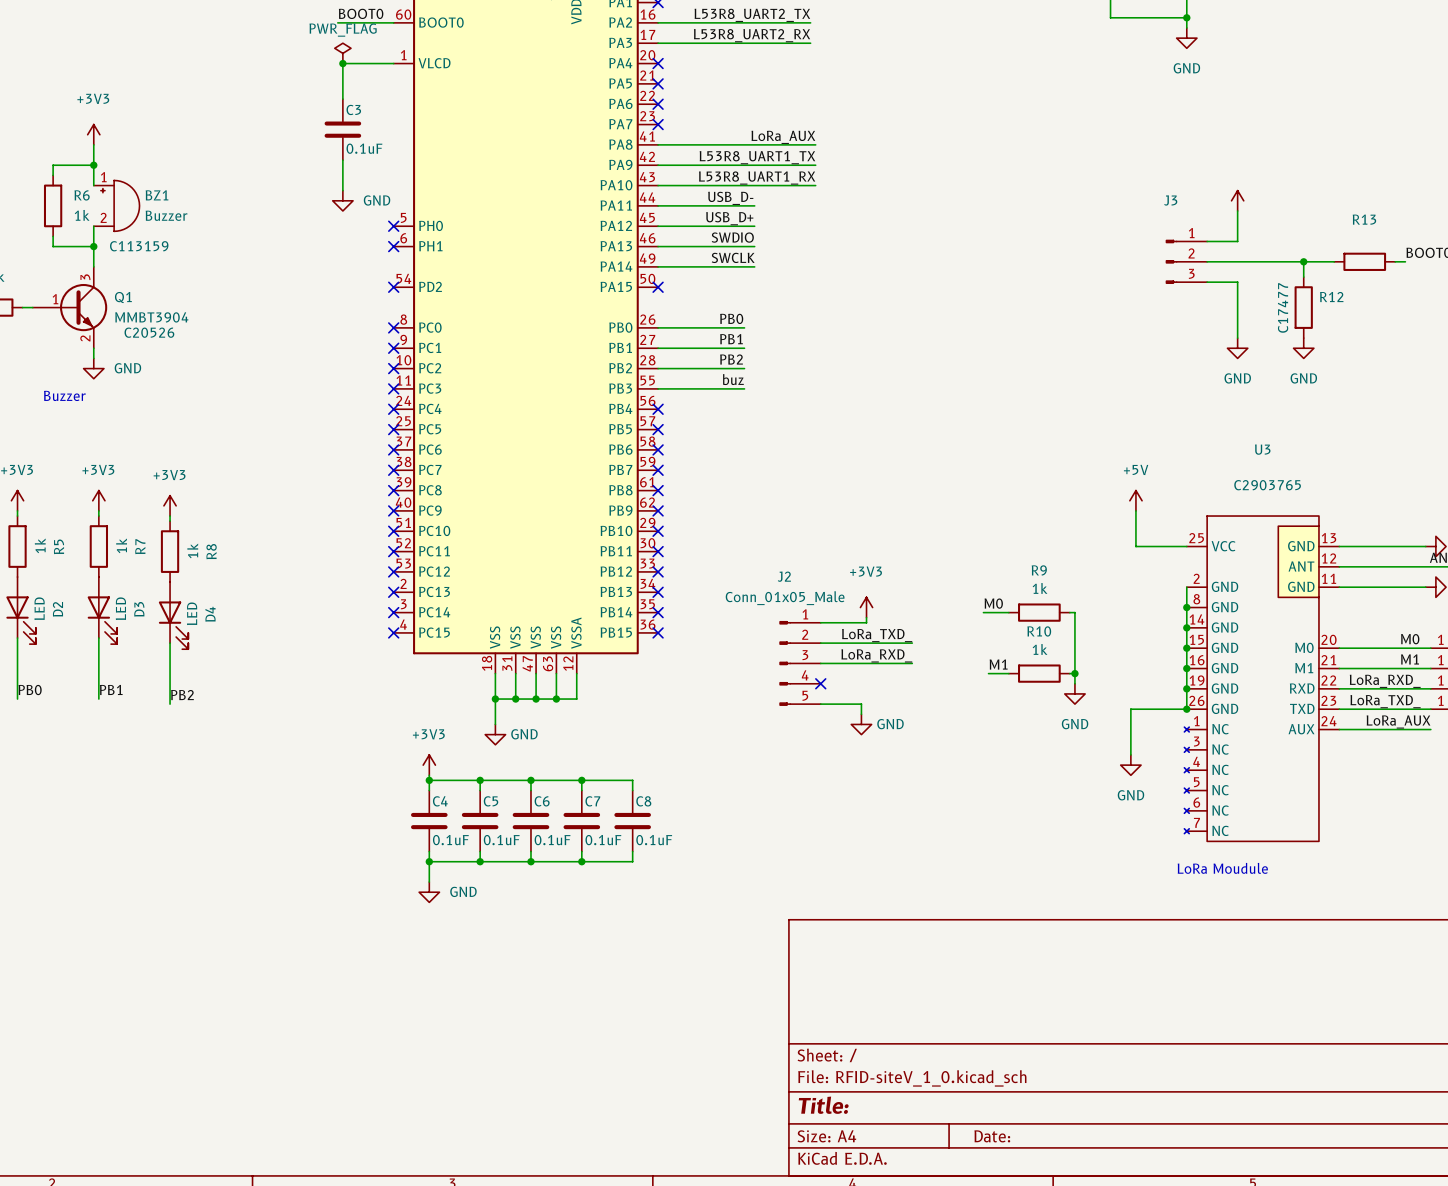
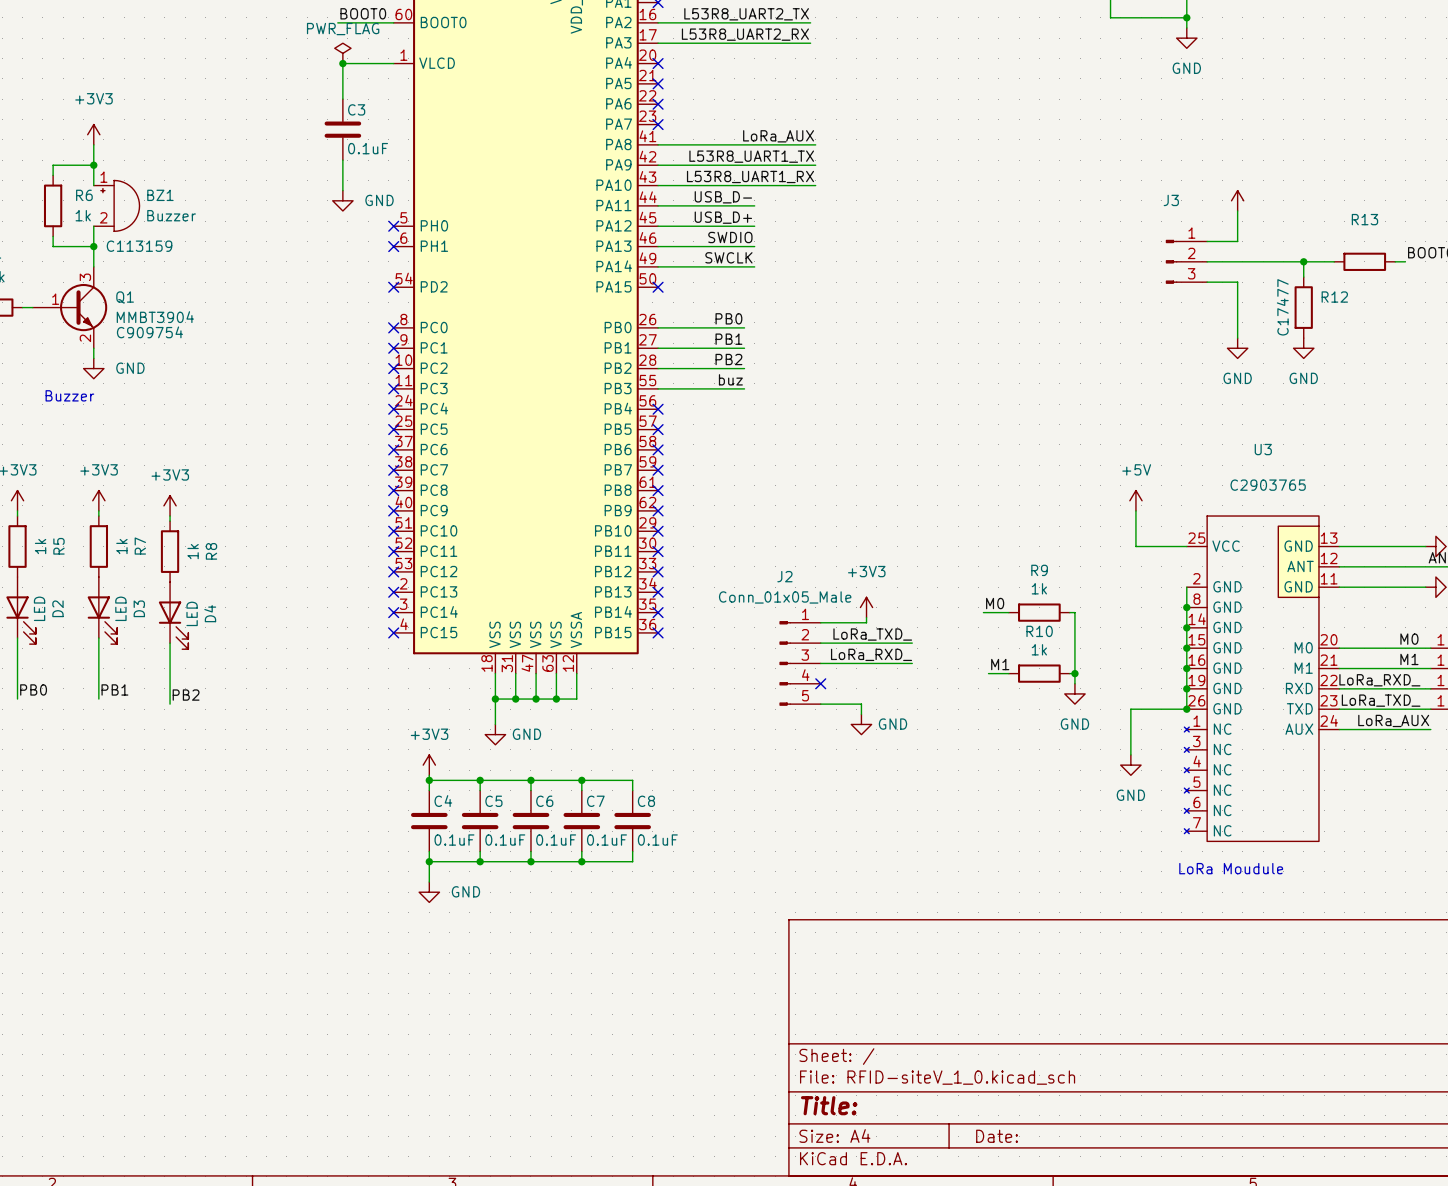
Q1 text: C20526 (149, 332) -> C909754 (149, 332)

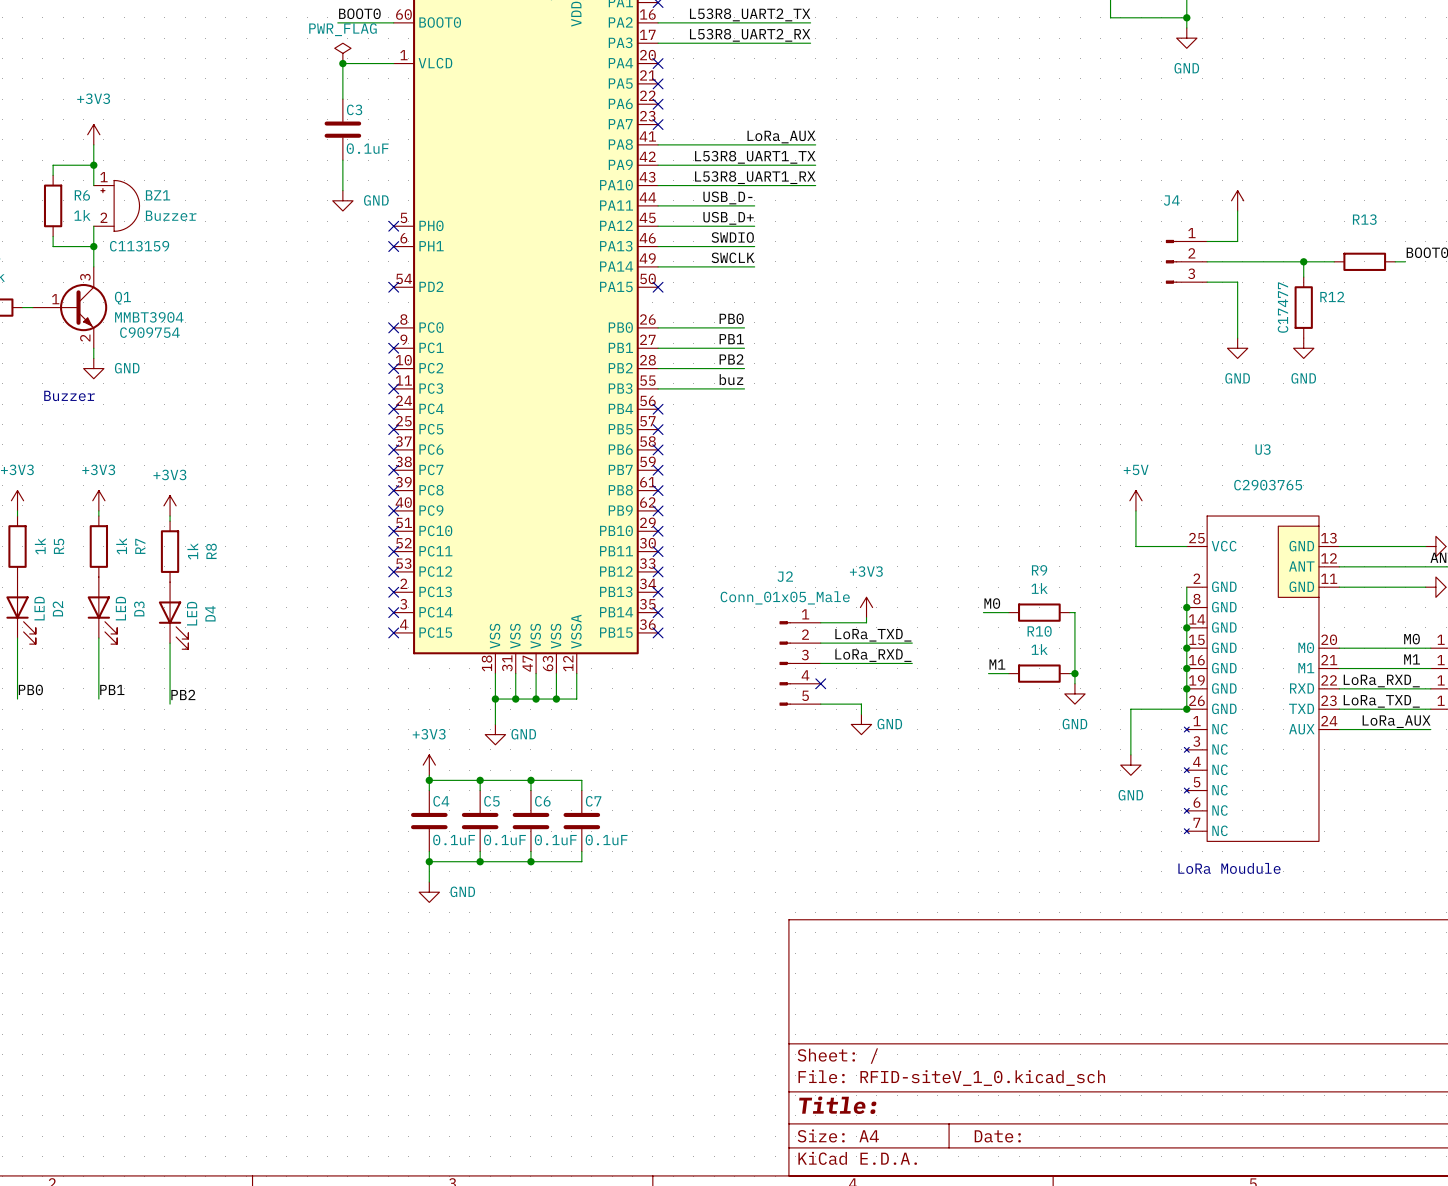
J3 name: J3 (1171, 200) -> J4 (1171, 200)
wire: (581, 780) (632, 780) (632, 790) -> none
junction: (581, 780) -> none
C8: 0.1uF (632, 821) -> none
wire: (632, 851) (632, 861) (581, 861) -> none
junction: (581, 861) -> none

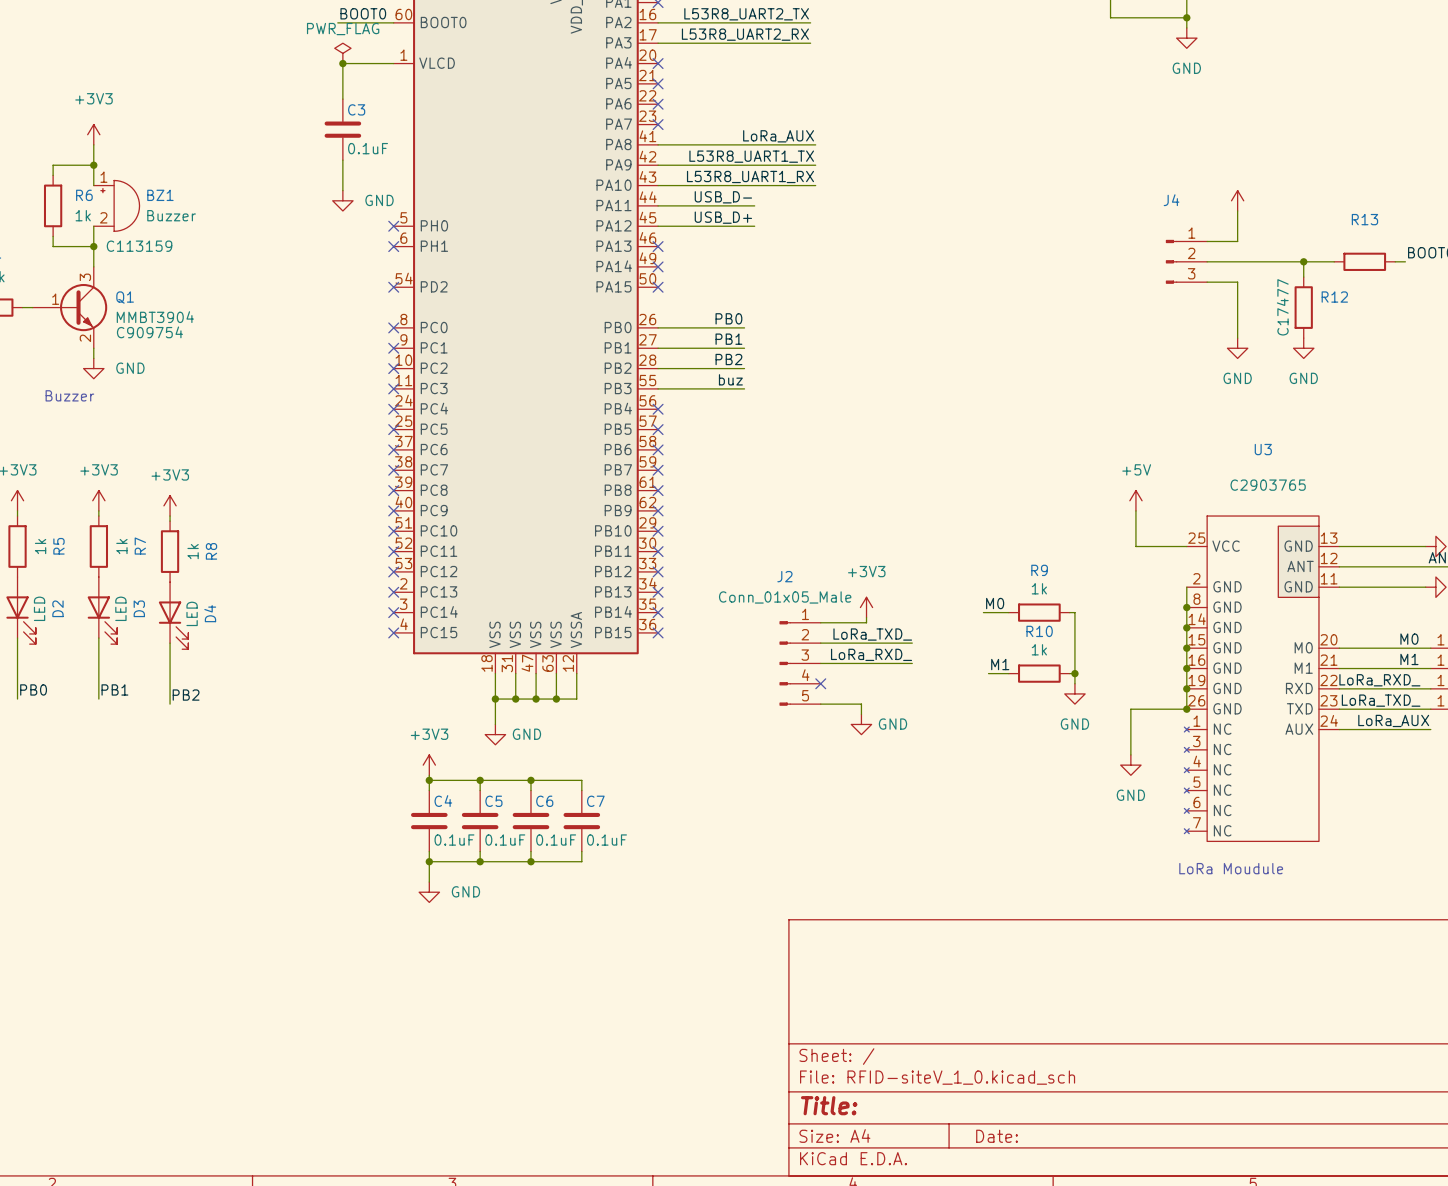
label: SWDIO (732, 237) -> none
wire: (658, 246) (754, 246) -> none
no-connect mark: none -> (658, 246)
label: SWCLK (732, 257) -> none
wire: (658, 266) (754, 266) -> none
no-connect mark: none -> (658, 266)

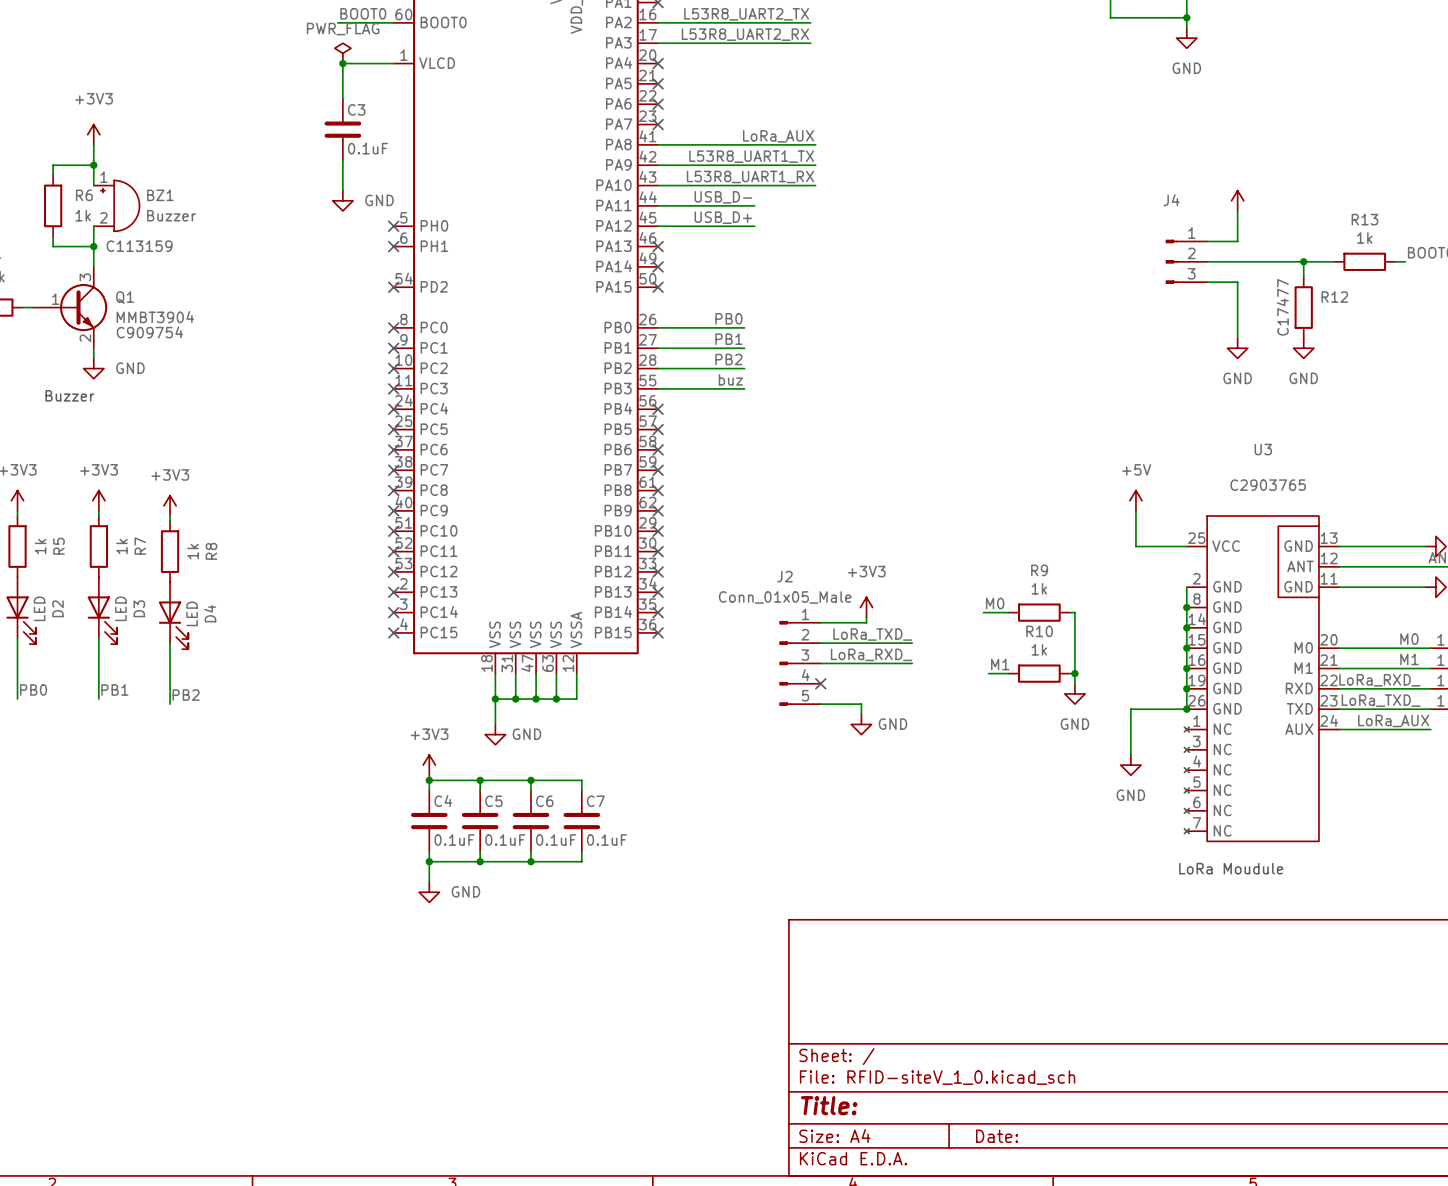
R13 value: none -> 1k (1364, 238)

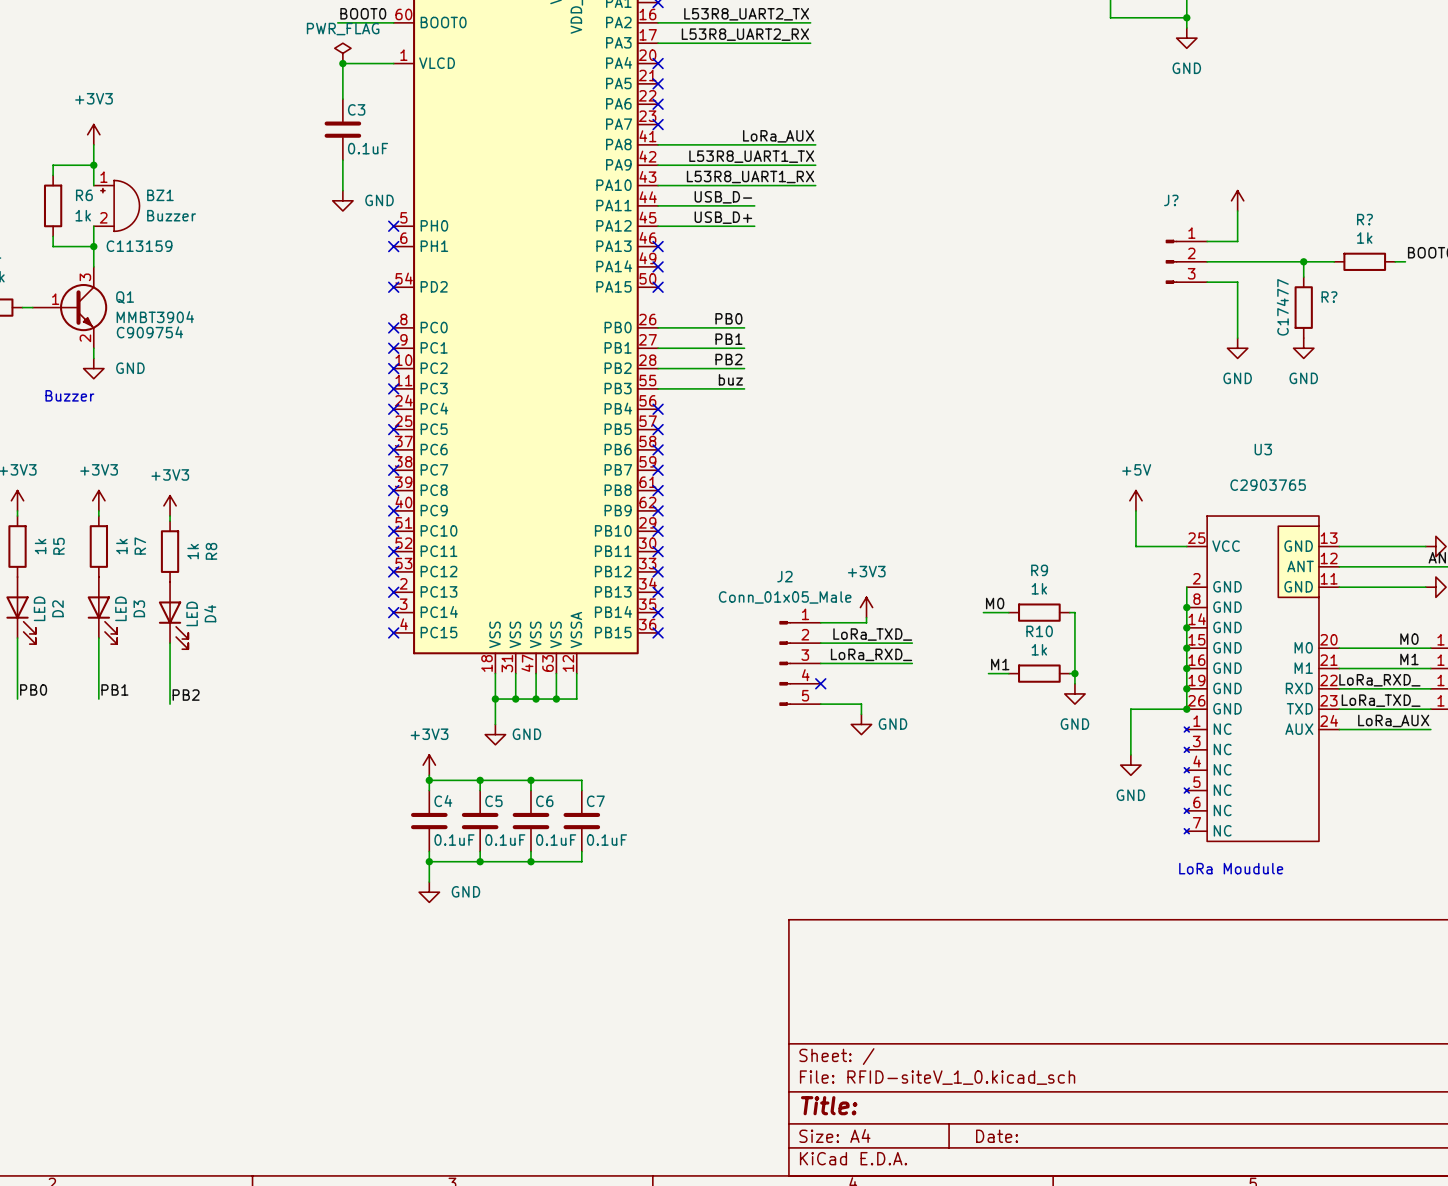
J4 name: J4 (1171, 200) -> J? (1171, 200)
R13 name: R13 (1364, 219) -> R? (1364, 219)
R12 name: R12 (1334, 297) -> R? (1329, 297)

